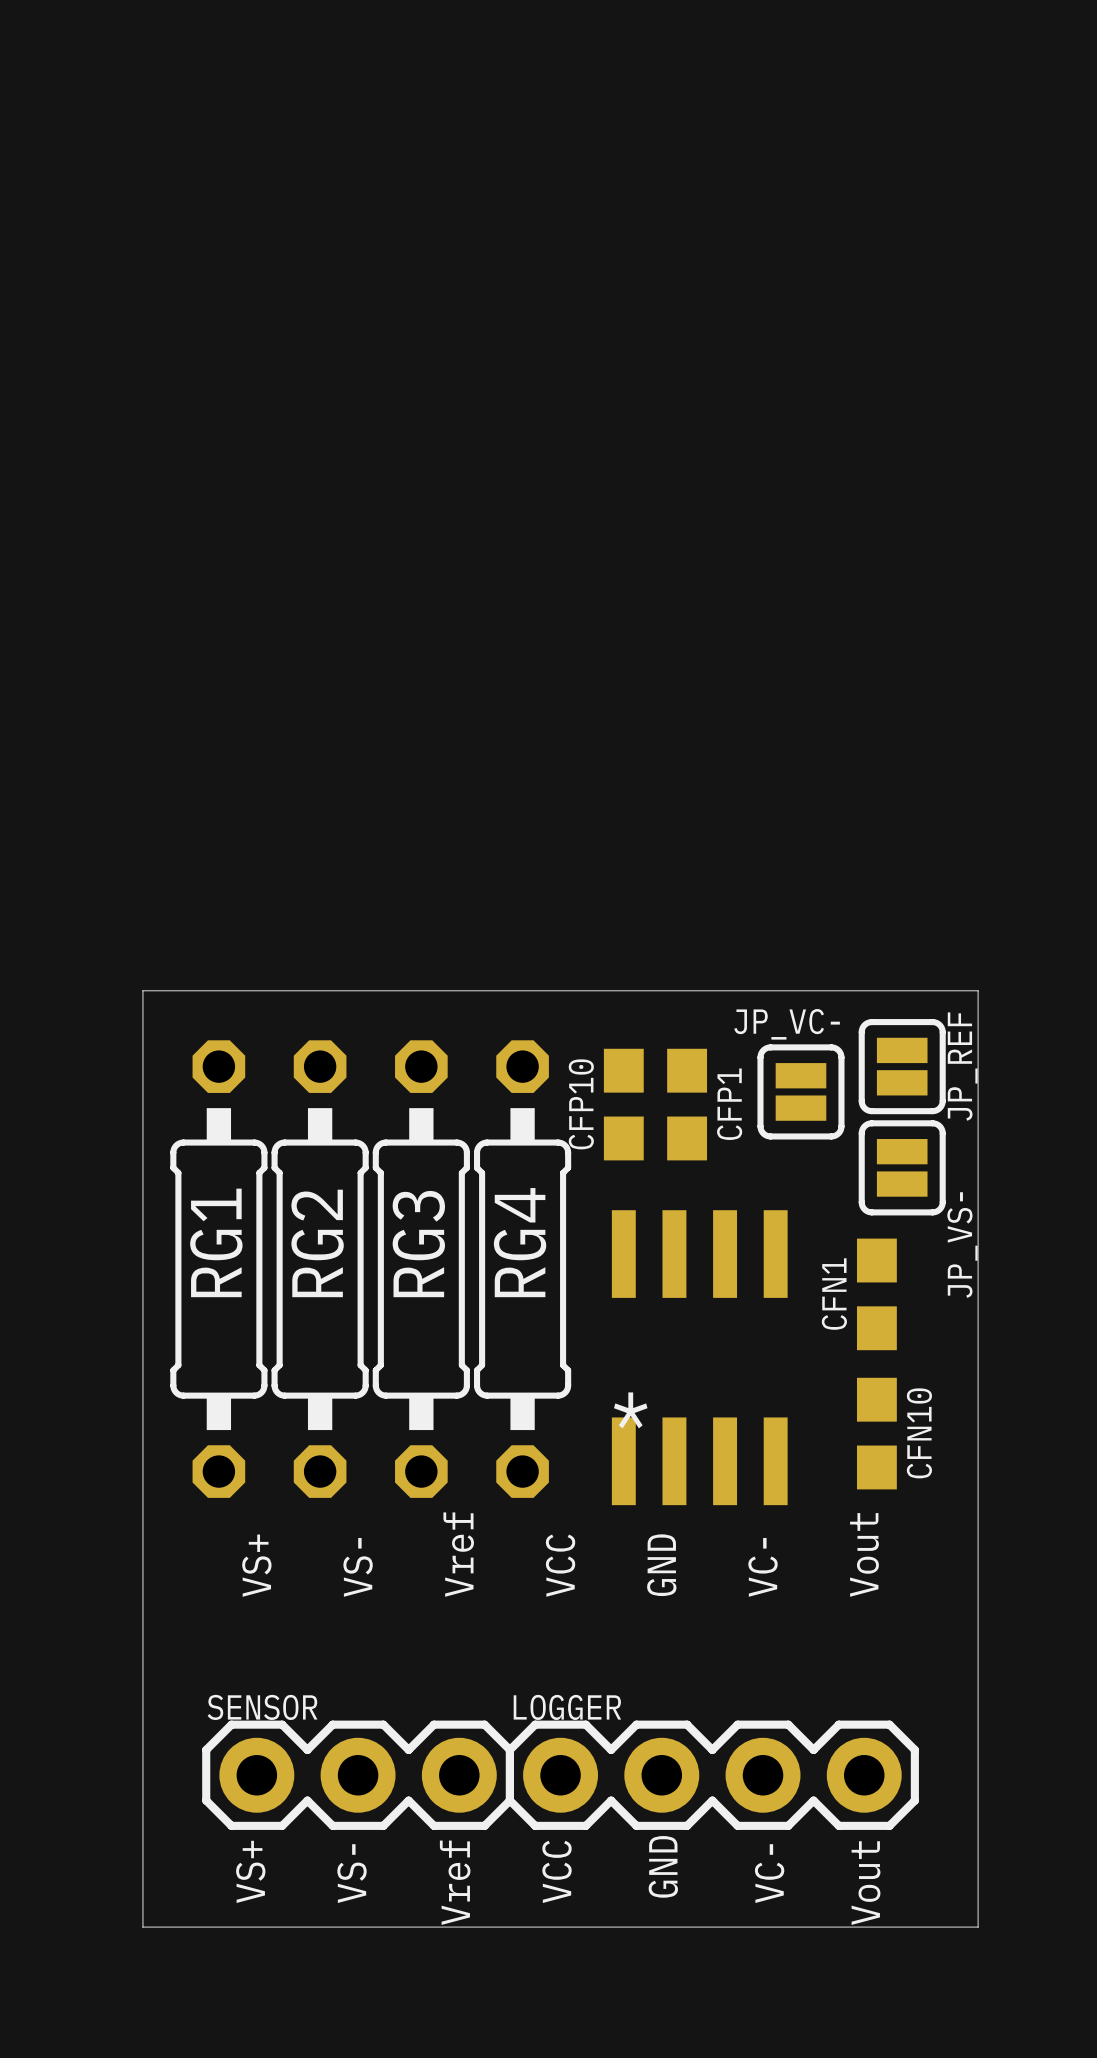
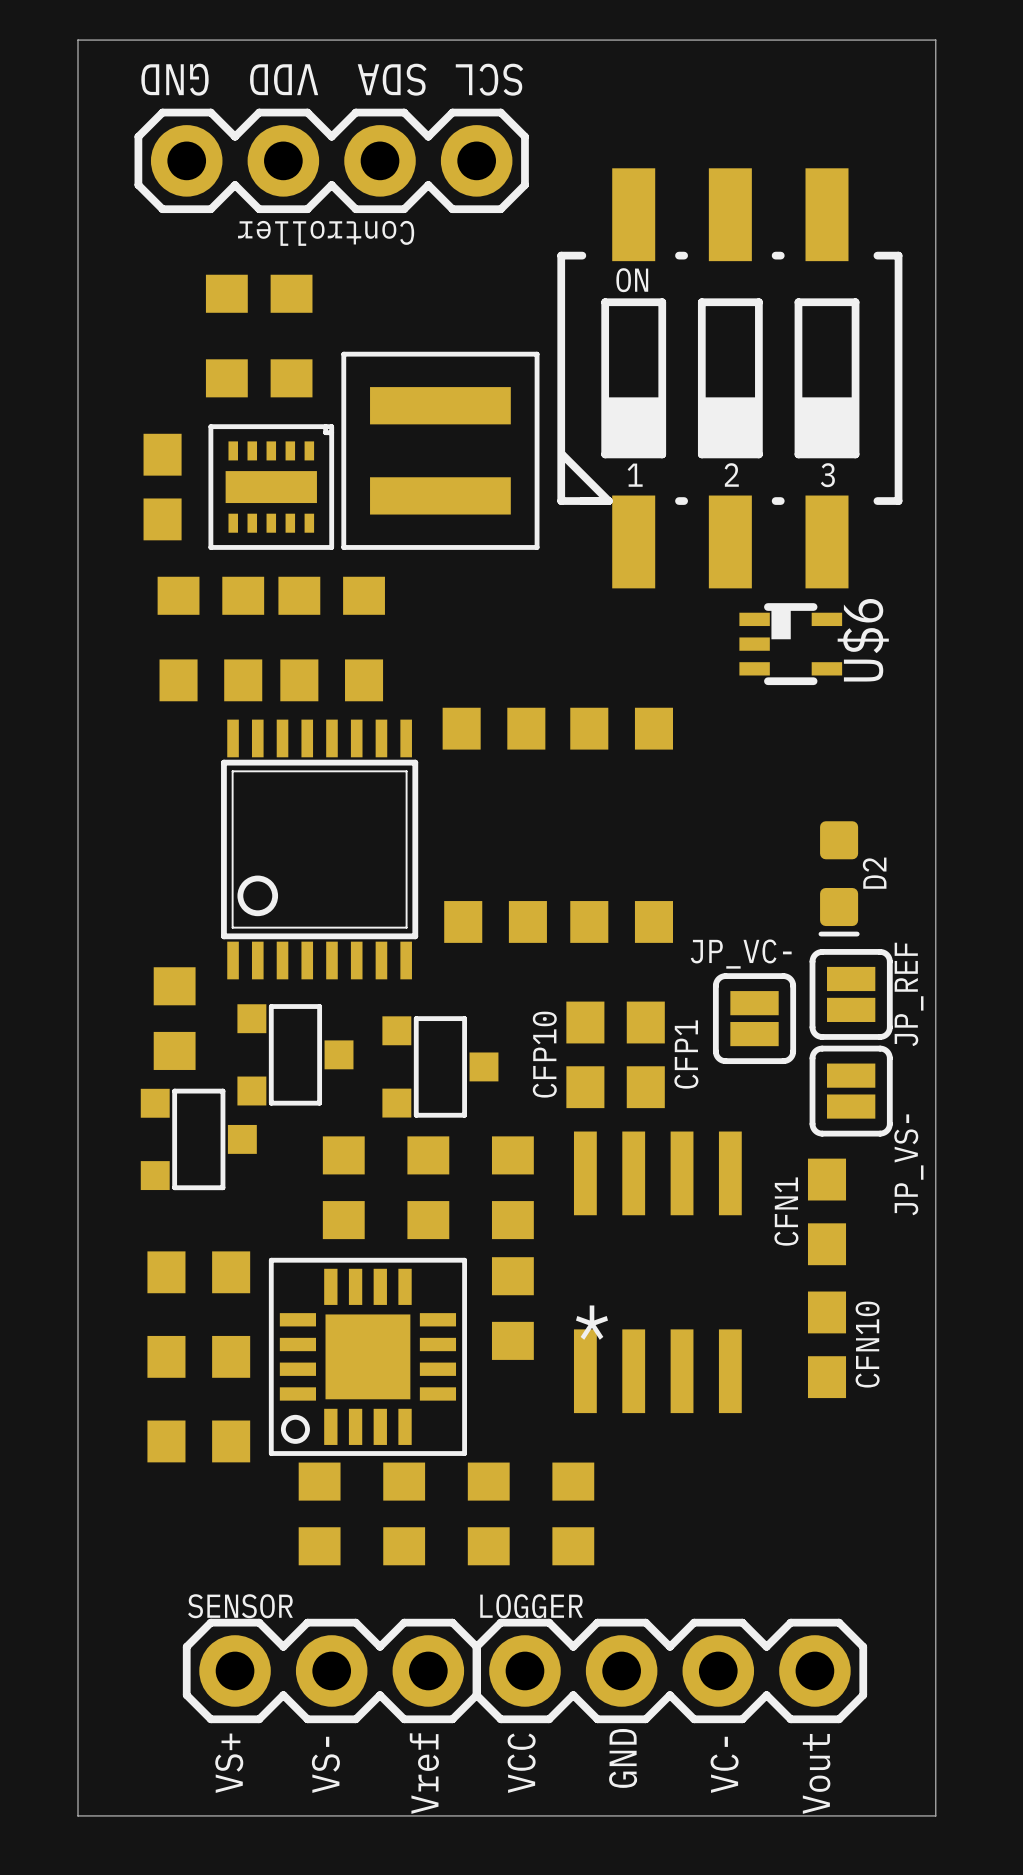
text: none -> GND (174, 79)
text: none -> VDD (284, 79)
text: none -> SDA (392, 79)
text: none -> SCL (489, 79)
part: none -> (331, 160)
text: none -> Controller (326, 233)
part: none -> (259, 293)
part: none -> (259, 378)
part: none -> (729, 378)
part: none -> (440, 450)
part: none -> (162, 487)
part: none -> (271, 487)
part: none -> (210, 595)
part: none -> (331, 595)
U$6: none -> (790, 644)
part: none -> (210, 680)
part: none -> (331, 680)
part: none -> (493, 728)
part: none -> (621, 728)
part: none -> (319, 849)
D2: none -> (839, 878)
part: none -> (495, 921)
part: none -> (621, 921)
part: none -> (174, 1018)
CFP10 position: (623, 1104) -> (585, 1054)
CFP1 position: (687, 1104) -> (645, 1054)
part: none -> (295, 1054)
part: none -> (440, 1066)
part: none -> (198, 1139)
RG1: (218, 1269) -> none
RG2: (320, 1269) -> none
part: none -> (343, 1187)
RG3: (421, 1269) -> none
part: none -> (428, 1187)
RG4: (522, 1269) -> none
part: none -> (512, 1187)
part: none -> (198, 1272)
part: none -> (512, 1308)
part: none -> (198, 1356)
part: none -> (367, 1356)
part: none -> (198, 1441)
text: Vref (458, 1554) -> none
text: Vout (864, 1554) -> none
text: VS+ (256, 1565) -> none
text: VCC (560, 1565) -> none
text: GND (661, 1565) -> none
text: VS- (358, 1567) -> none
text: VC- (763, 1567) -> none
part: none -> (319, 1513)
part: none -> (404, 1513)
part: none -> (488, 1513)
part: none -> (573, 1513)
board edge: (142, 1927) (142, 990) (978, 990) (978, 1927) -> (126, 1815) (77, 1815) (77, 40) (935, 40) (935, 1815) (923, 1815)

